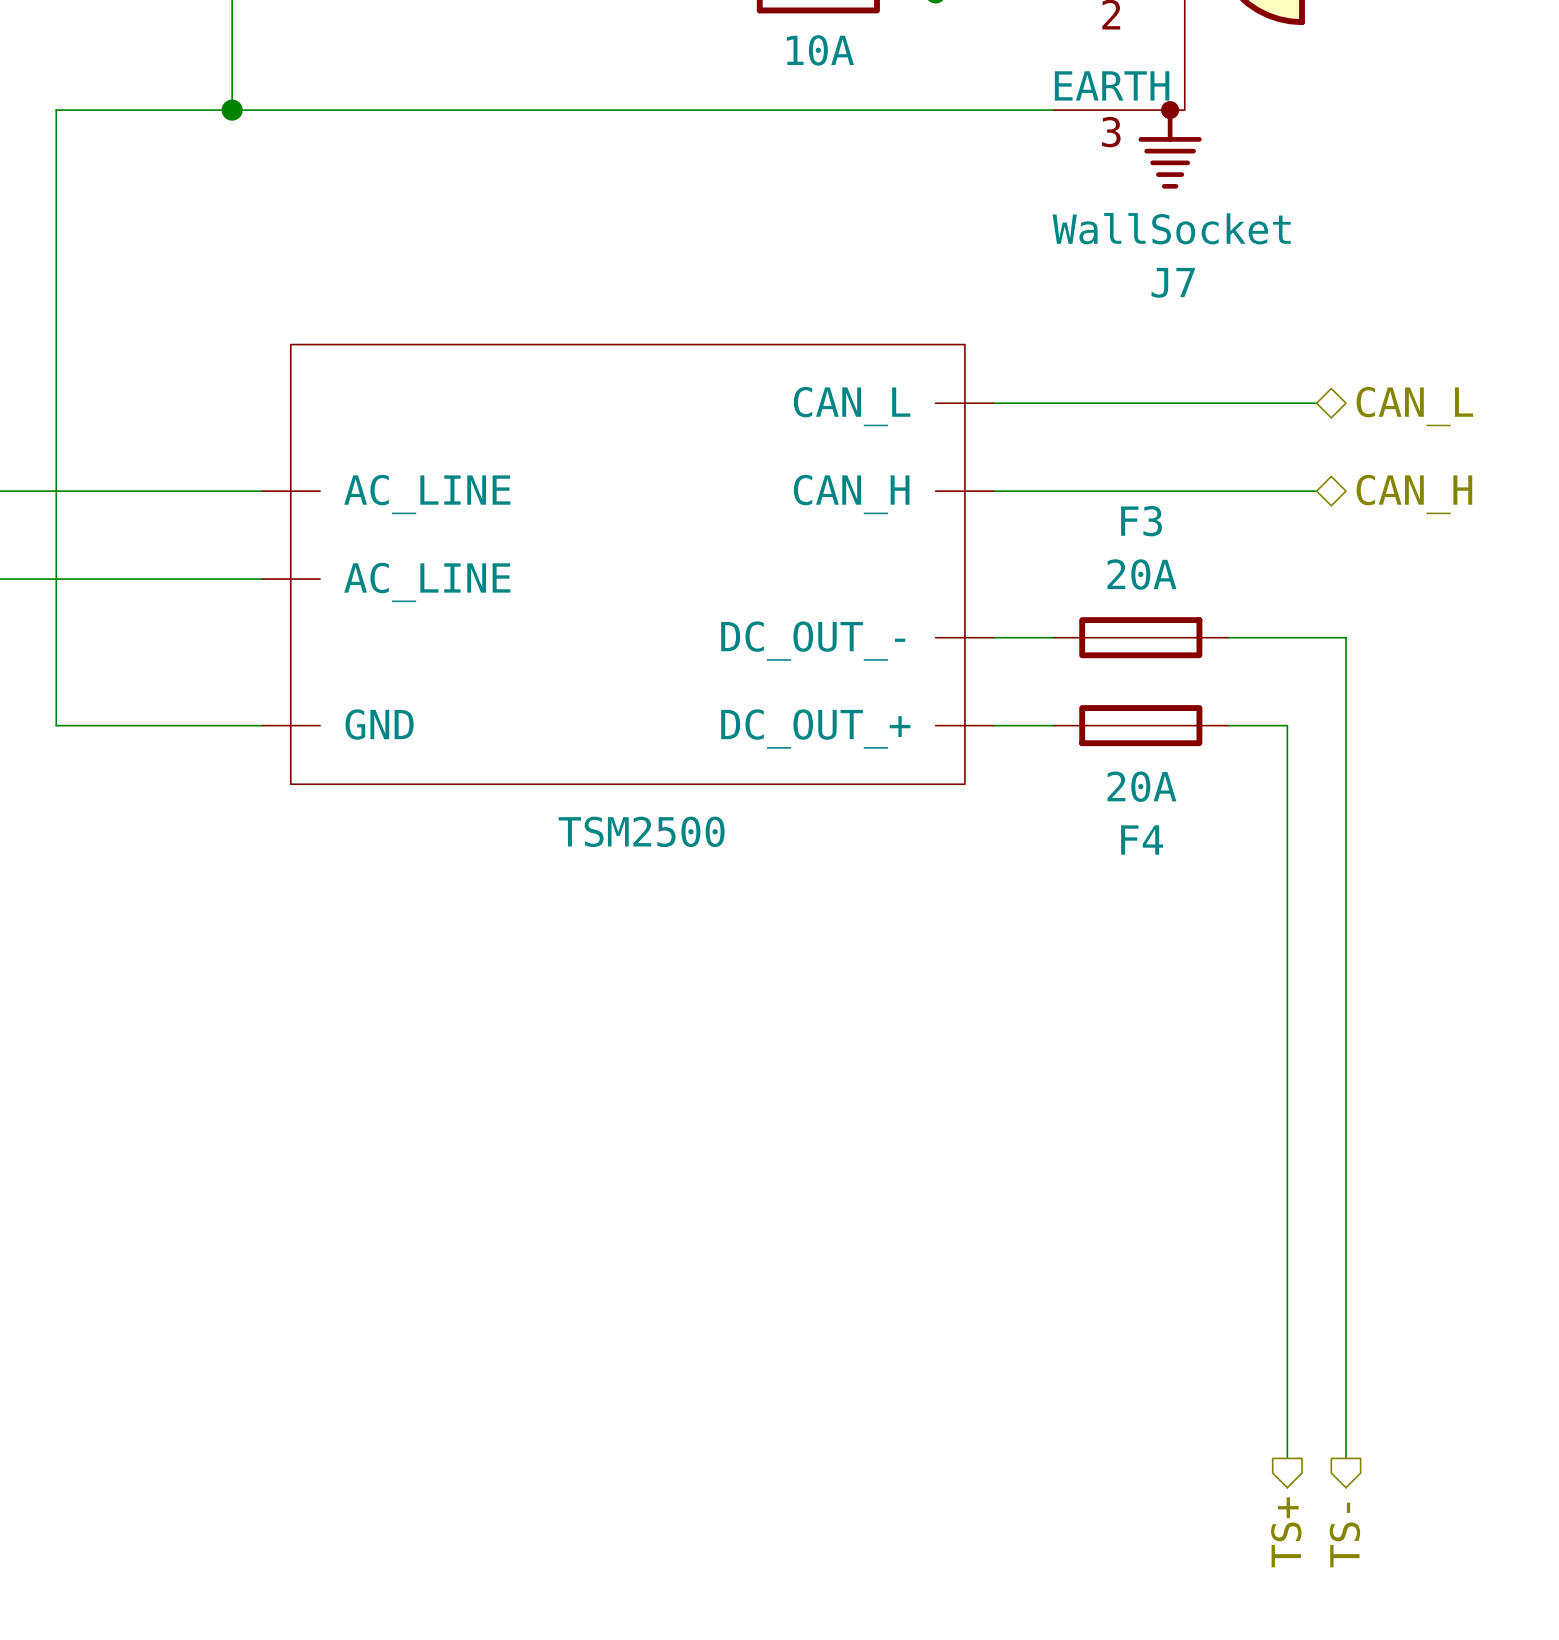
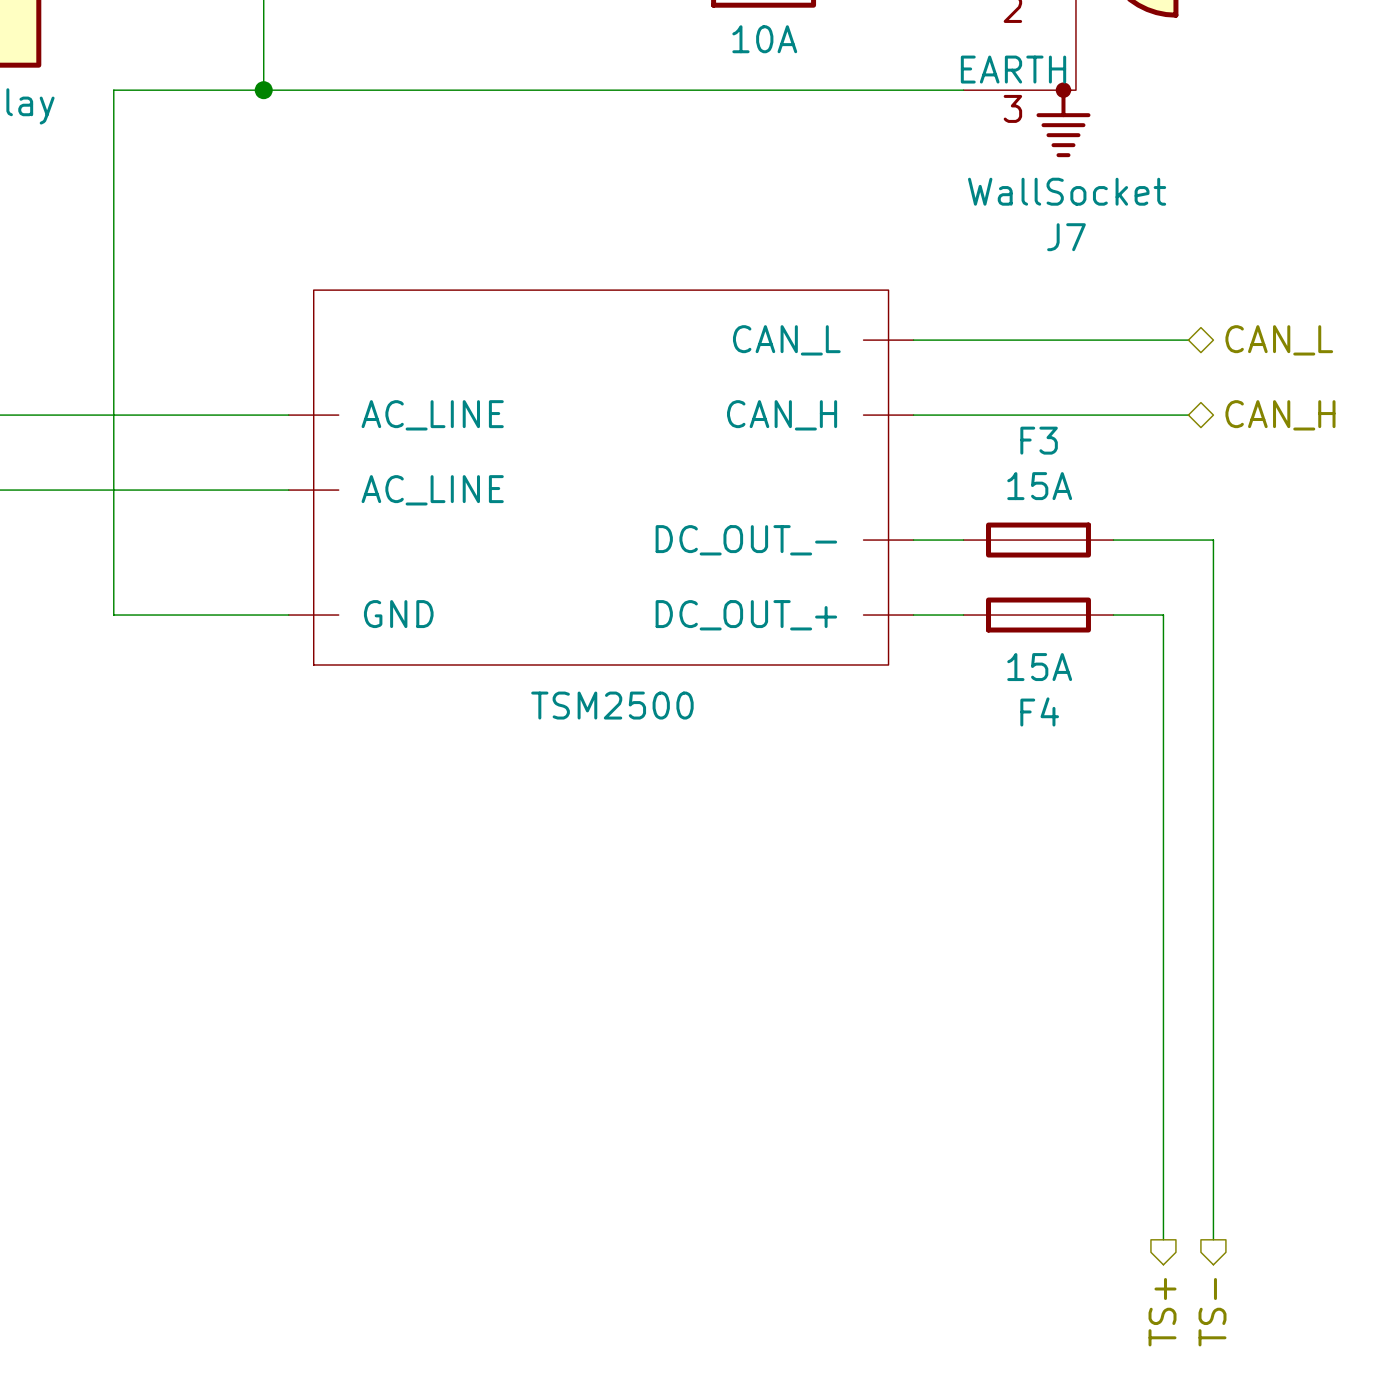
F3 value: 20A (1141, 574) -> 15A (1039, 486)
F4 value: 20A (1141, 786) -> 15A (1039, 667)

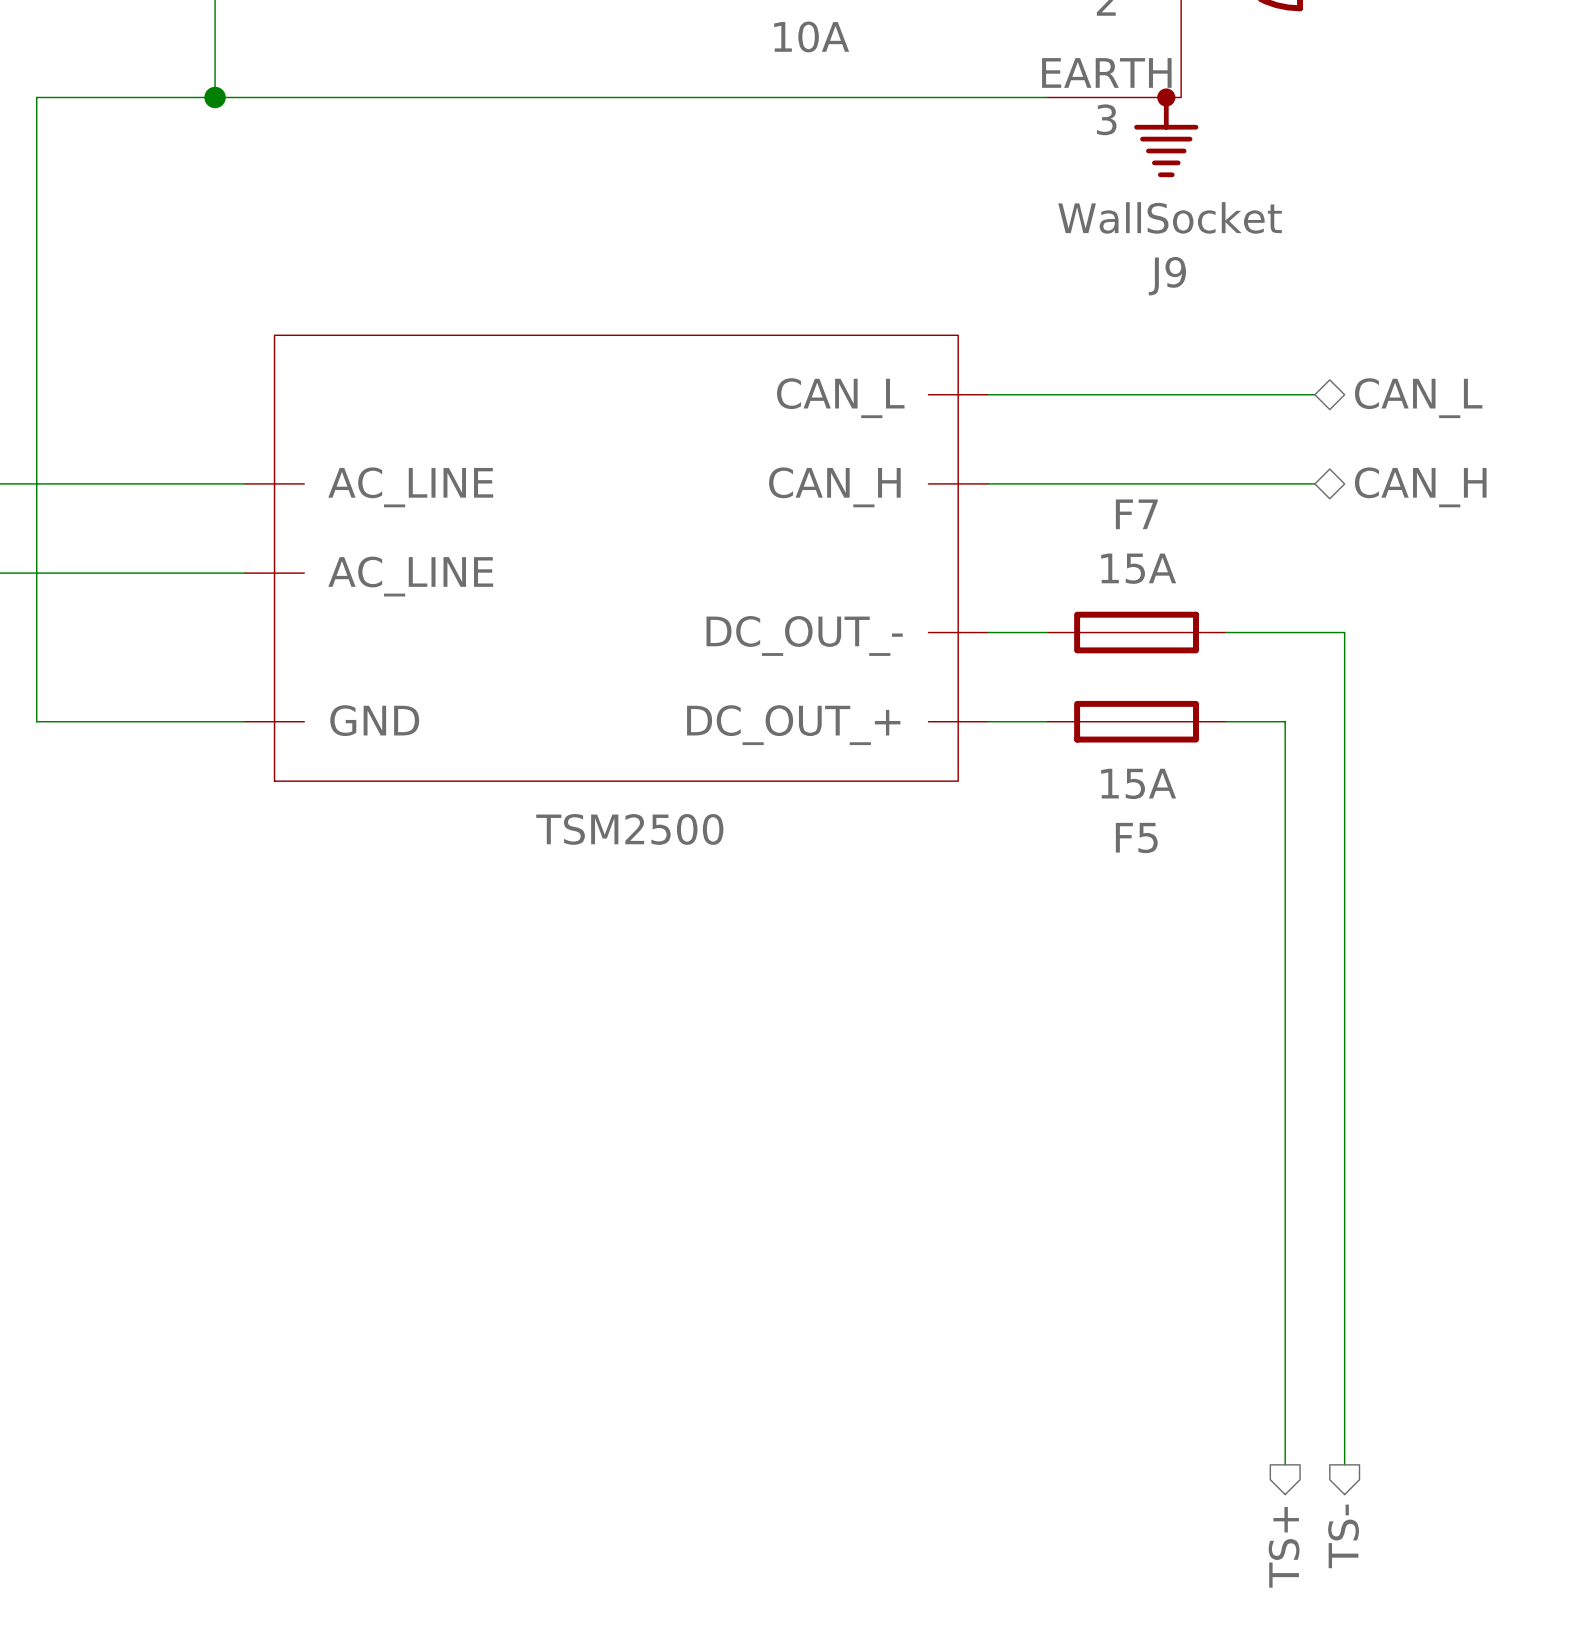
J7 name: J7 (1066, 237) -> J9 (1167, 276)
F3 name: F3 (1039, 440) -> F7 (1136, 514)
F4 name: F4 (1039, 711) -> F5 (1136, 838)

